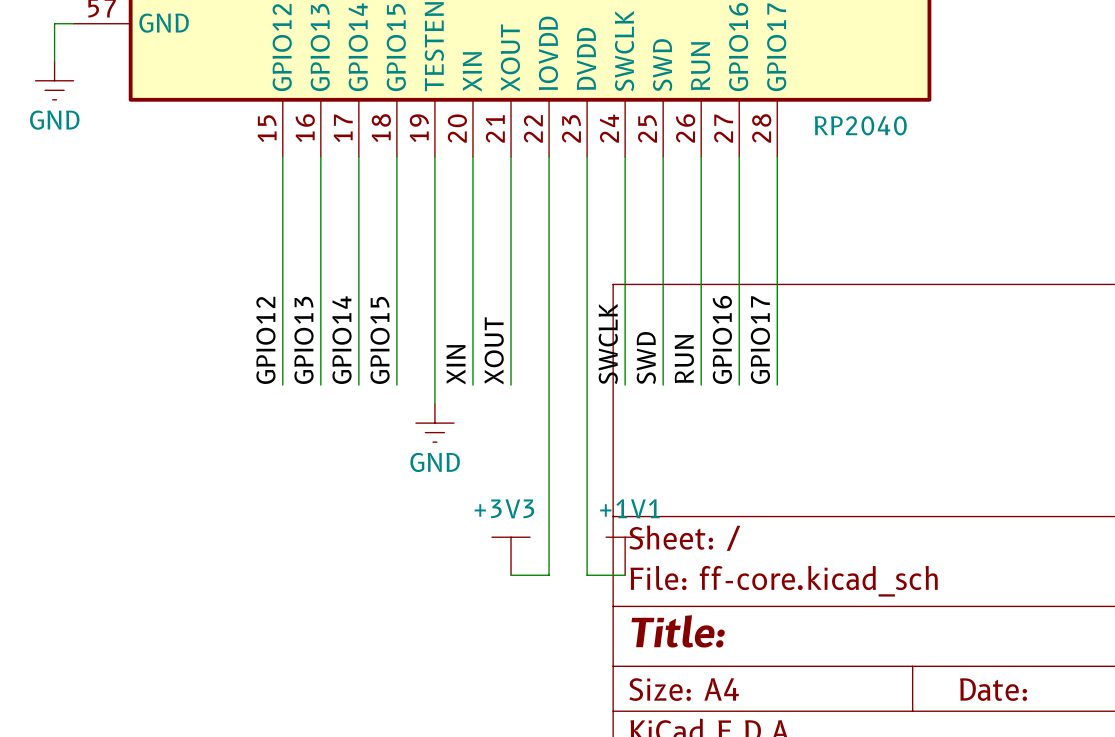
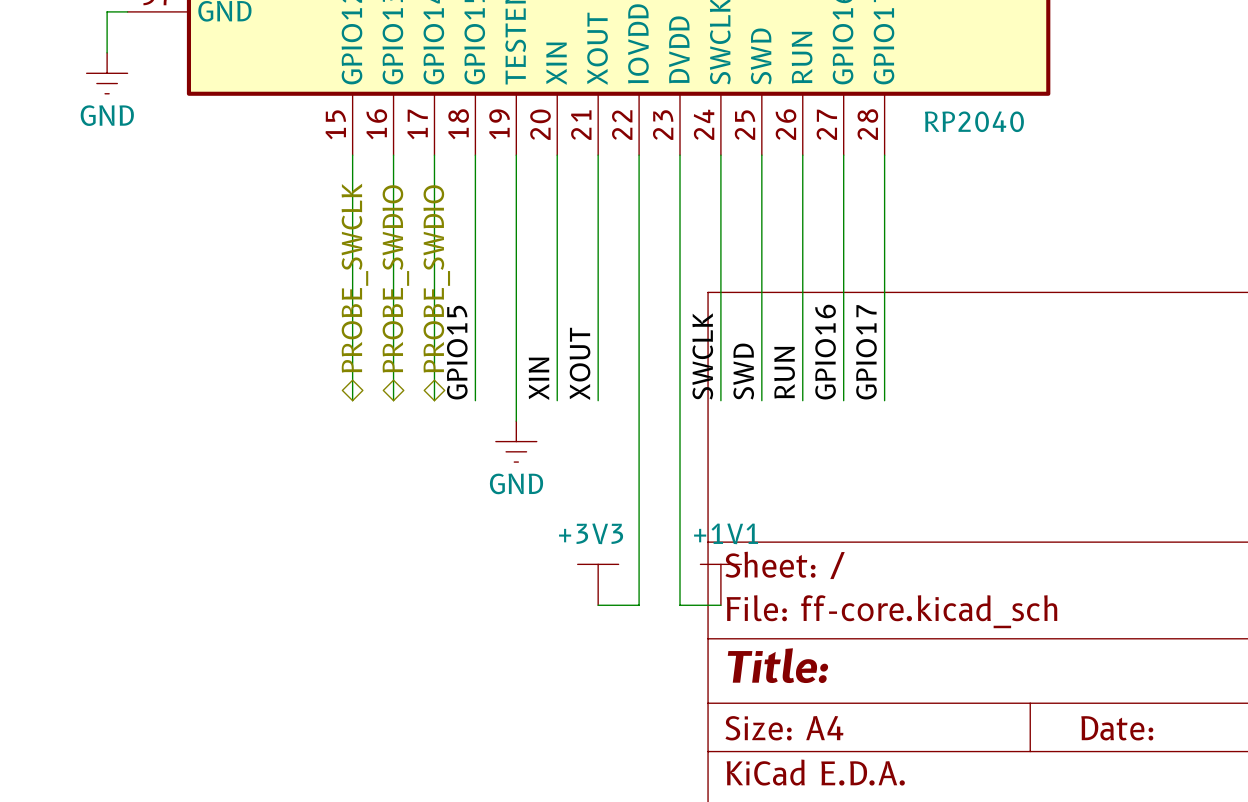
hierarchical label: none -> PROBE_SWCLK (354, 278)
hierarchical label: none -> PROBE_SWDIO (395, 278)
hierarchical label: none -> PROBE_SWDIO (436, 278)
label: GPIO12 (265, 340) -> none
label: GPIO13 (303, 340) -> none
label: GPIO14 (342, 340) -> none

